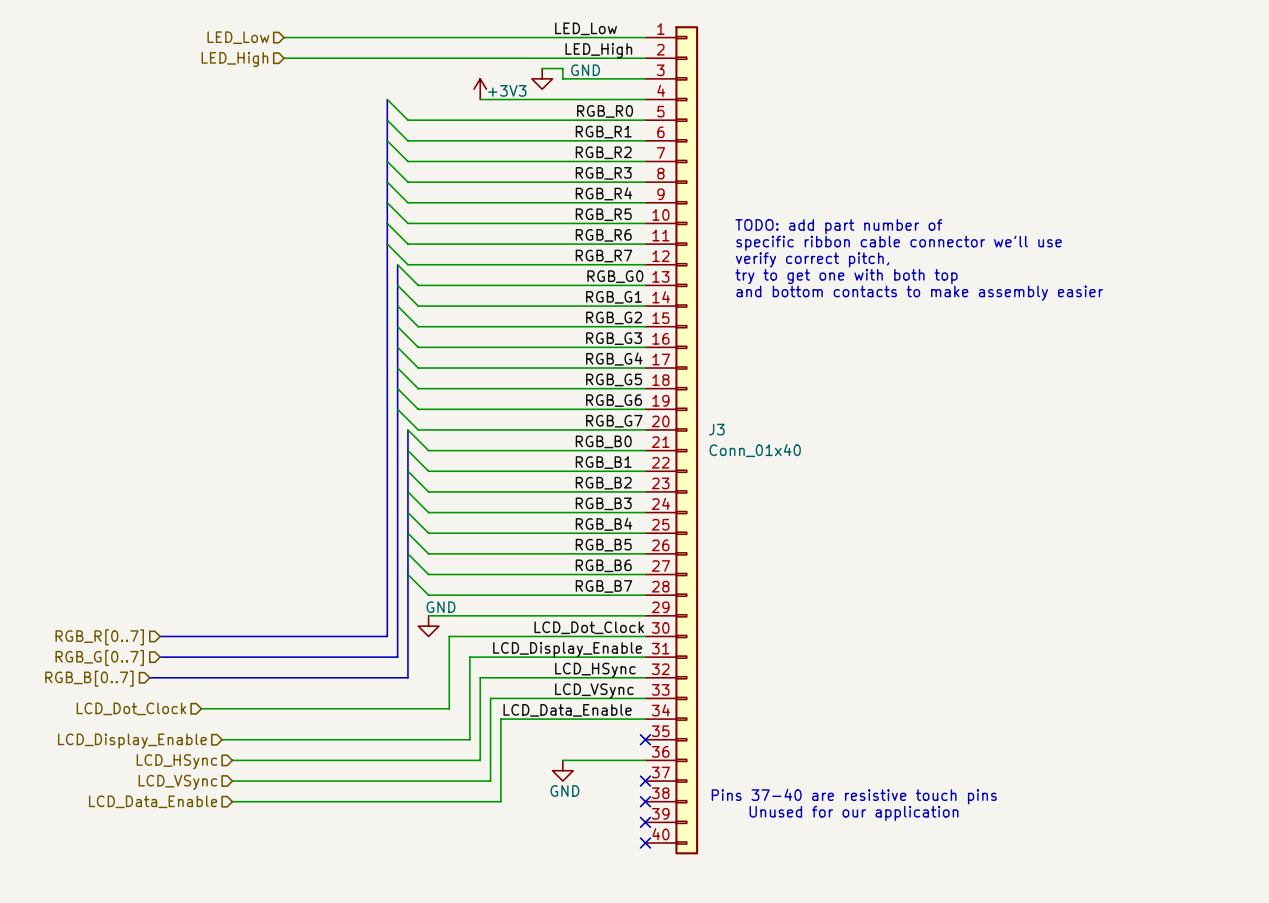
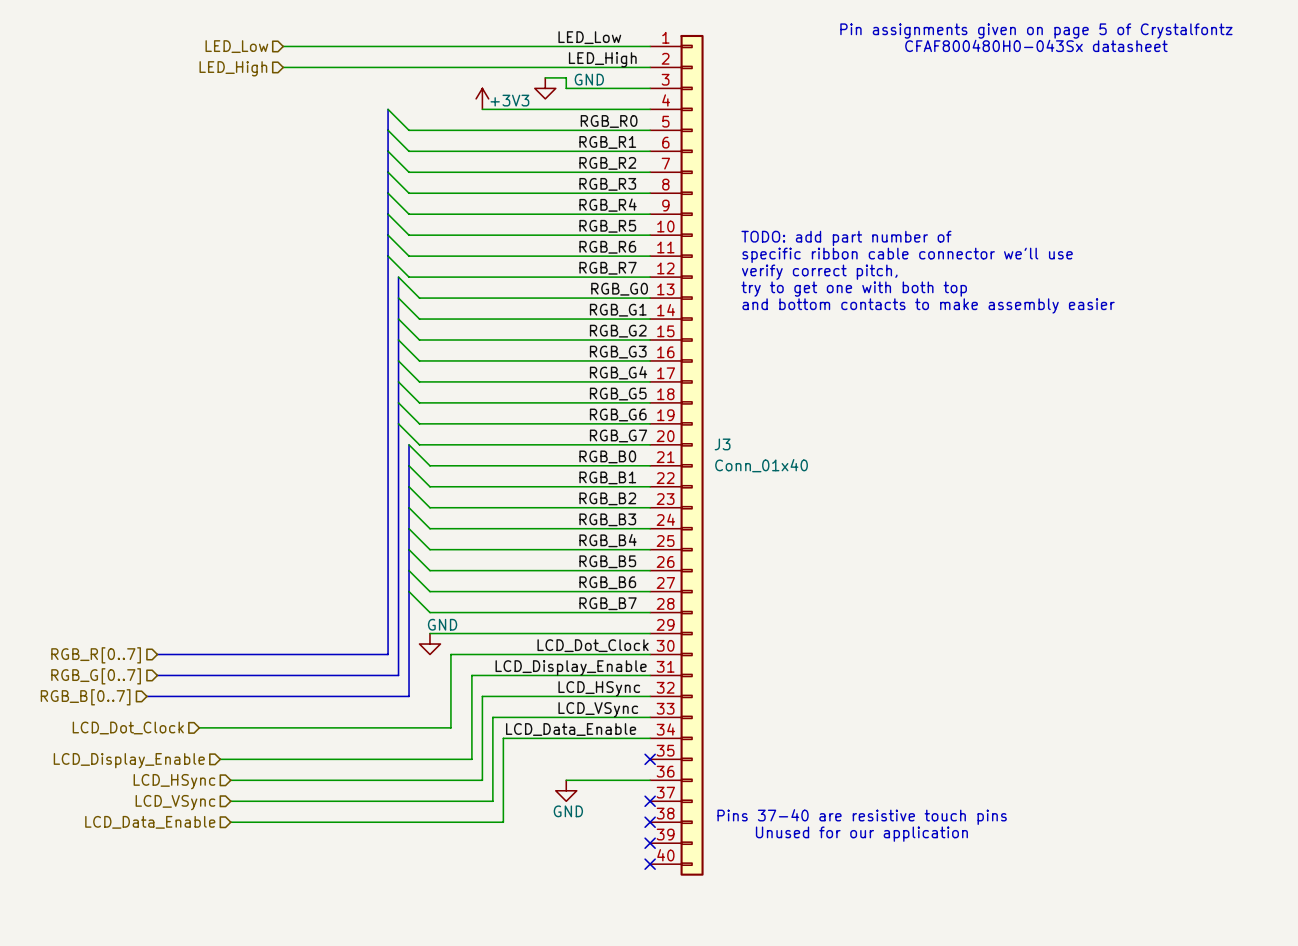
text: none -> Pin assignments given on page 5 of Crystalfontz (1036, 31)
text: none -> CFAF800480H0-043Sx datasheet (1036, 45)

